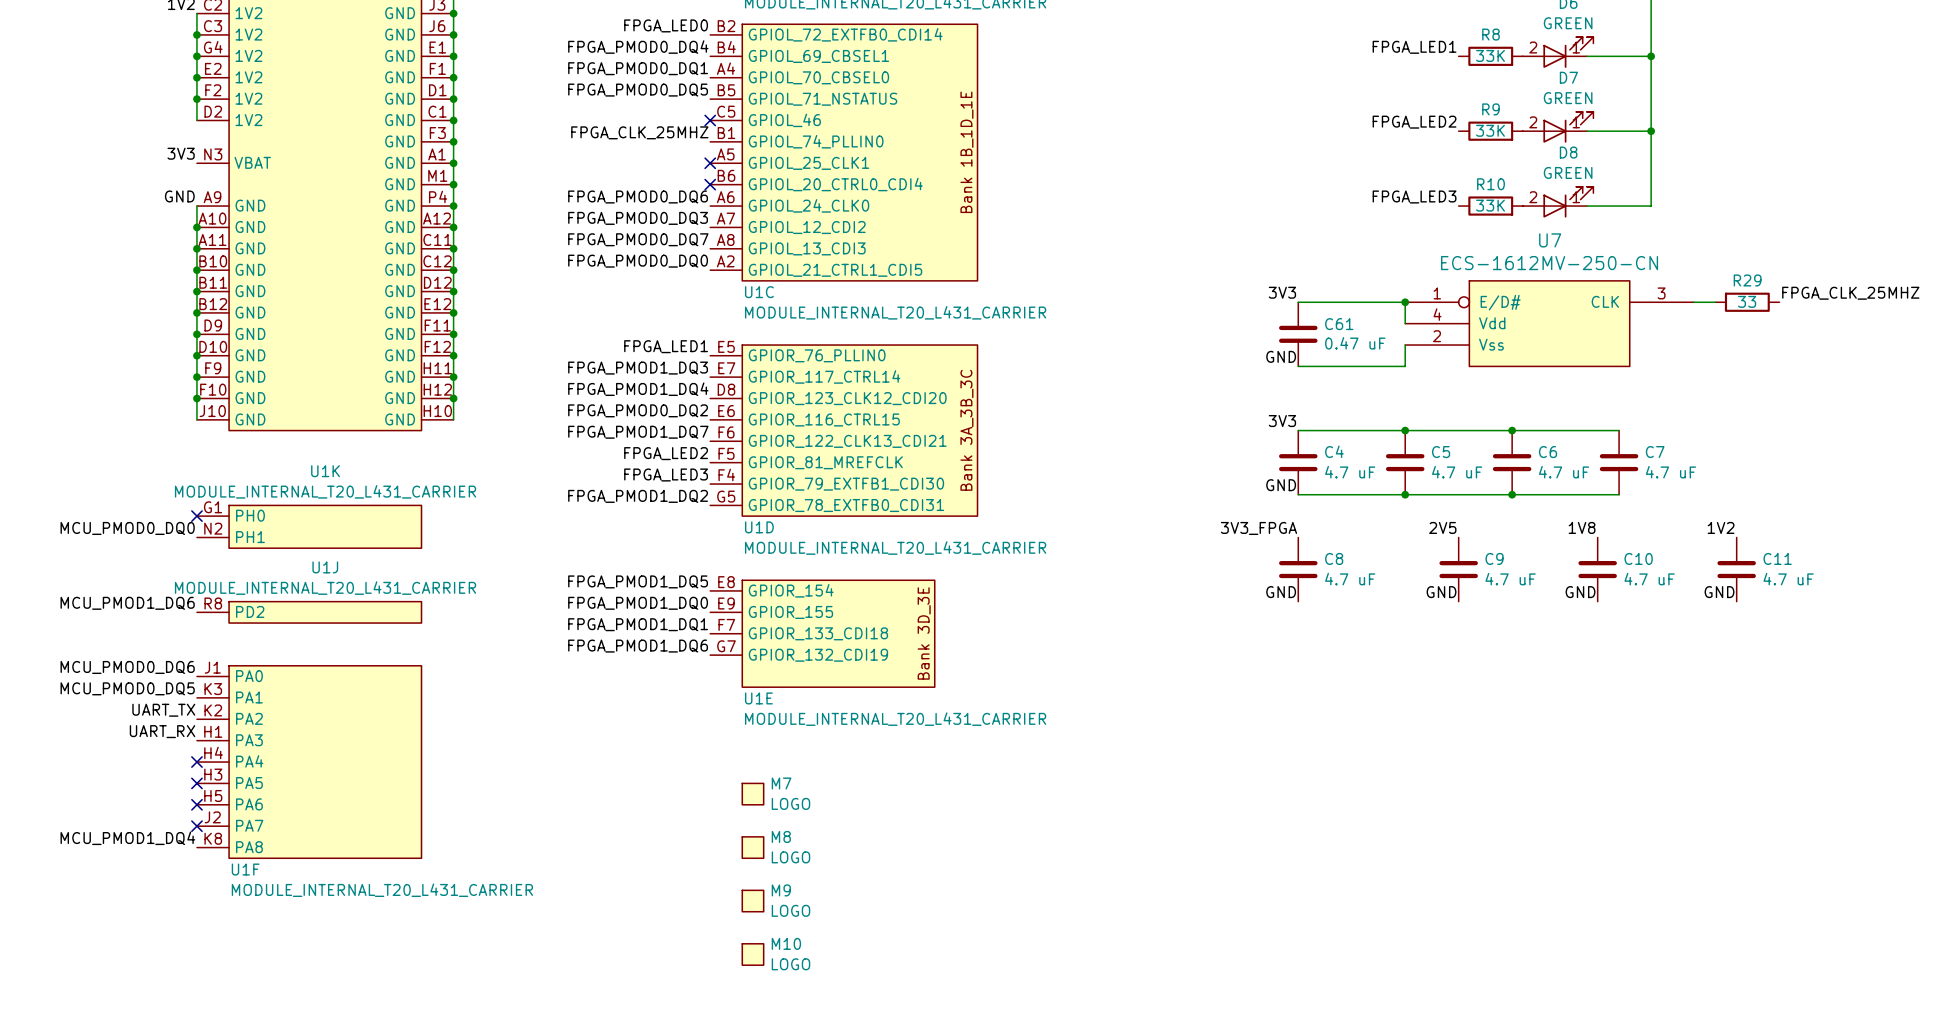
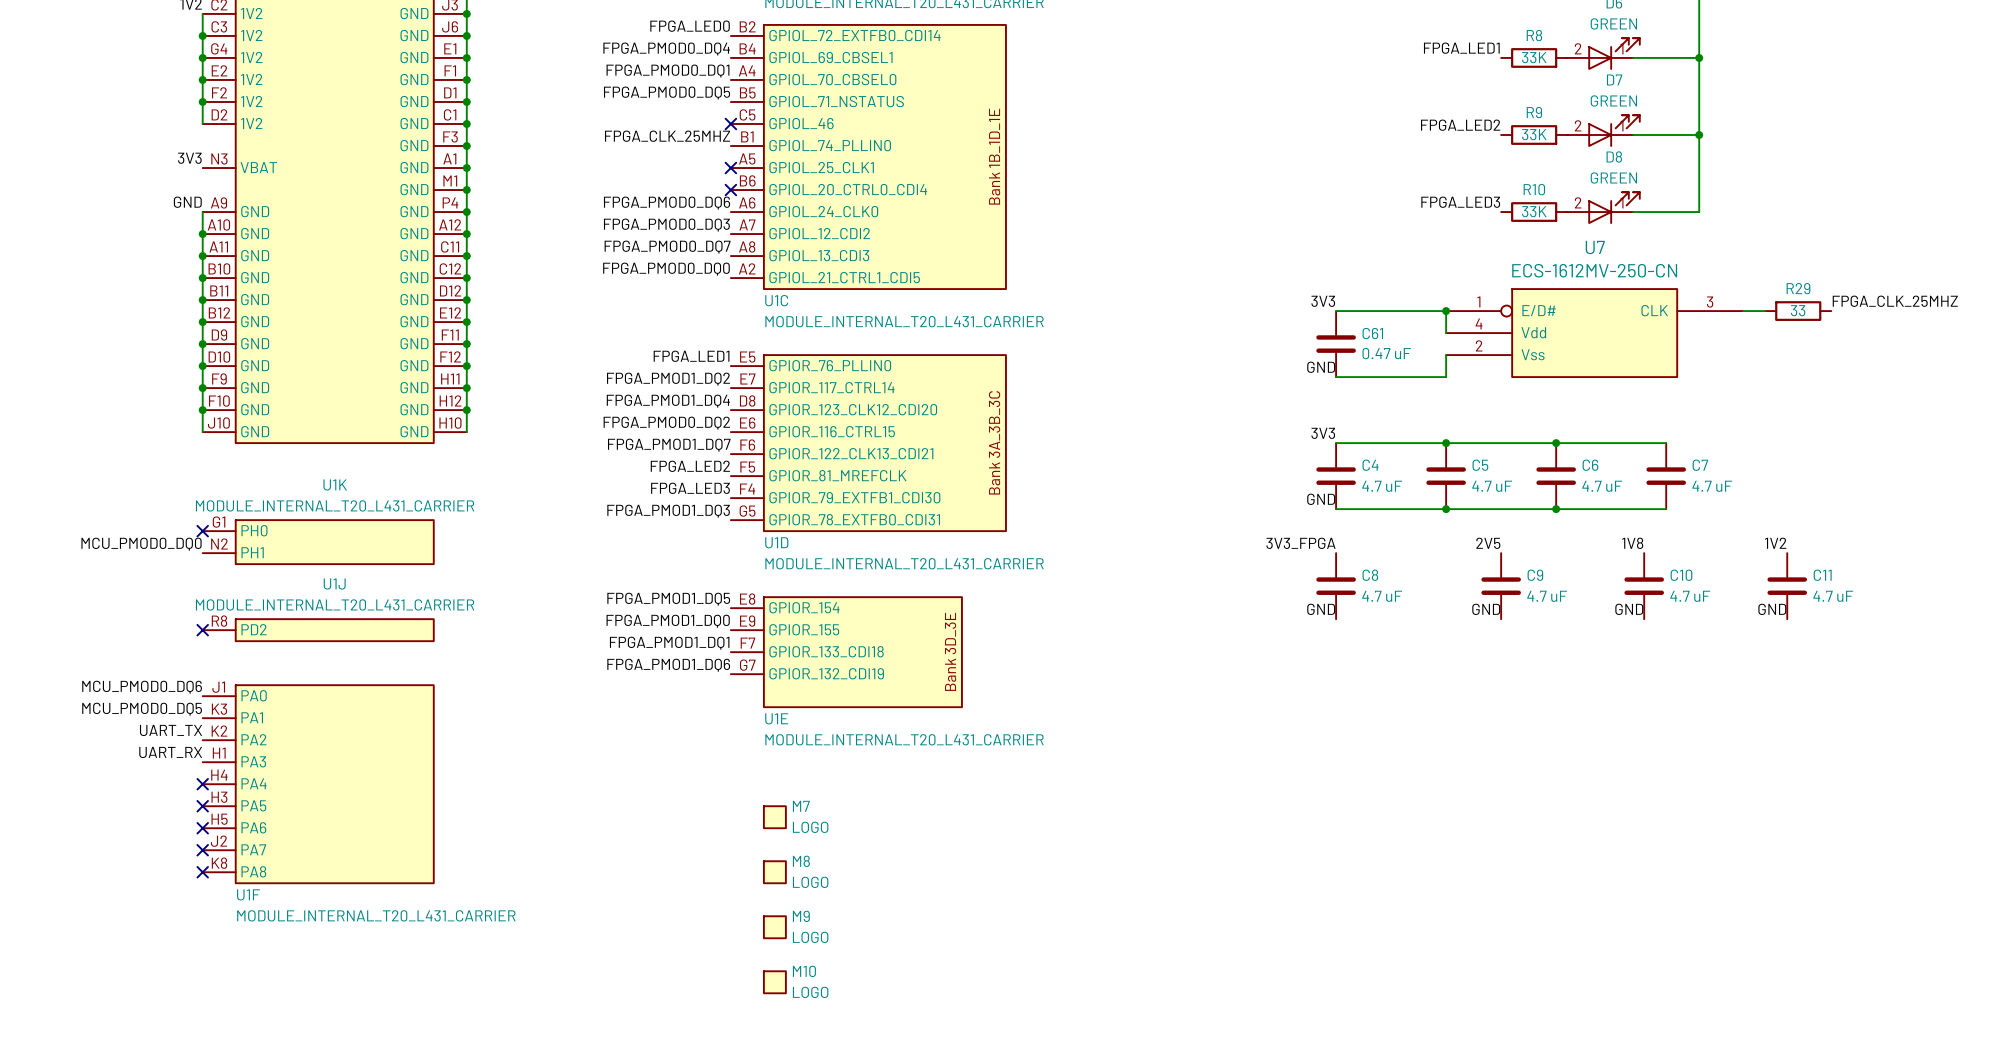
label: FPGA_PMOD1_DQ3 (638, 368) -> FPGA_PMOD1_DQ2 (668, 379)
label: FPGA_PMOD1_DQ2 (638, 496) -> FPGA_PMOD1_DQ3 (668, 511)
label: MCU_PMOD1_DQ6 (127, 603) -> none
no-connect mark: none -> (202, 630)
label: MCU_PMOD1_DQ4 (127, 838) -> none
no-connect mark: none -> (202, 872)

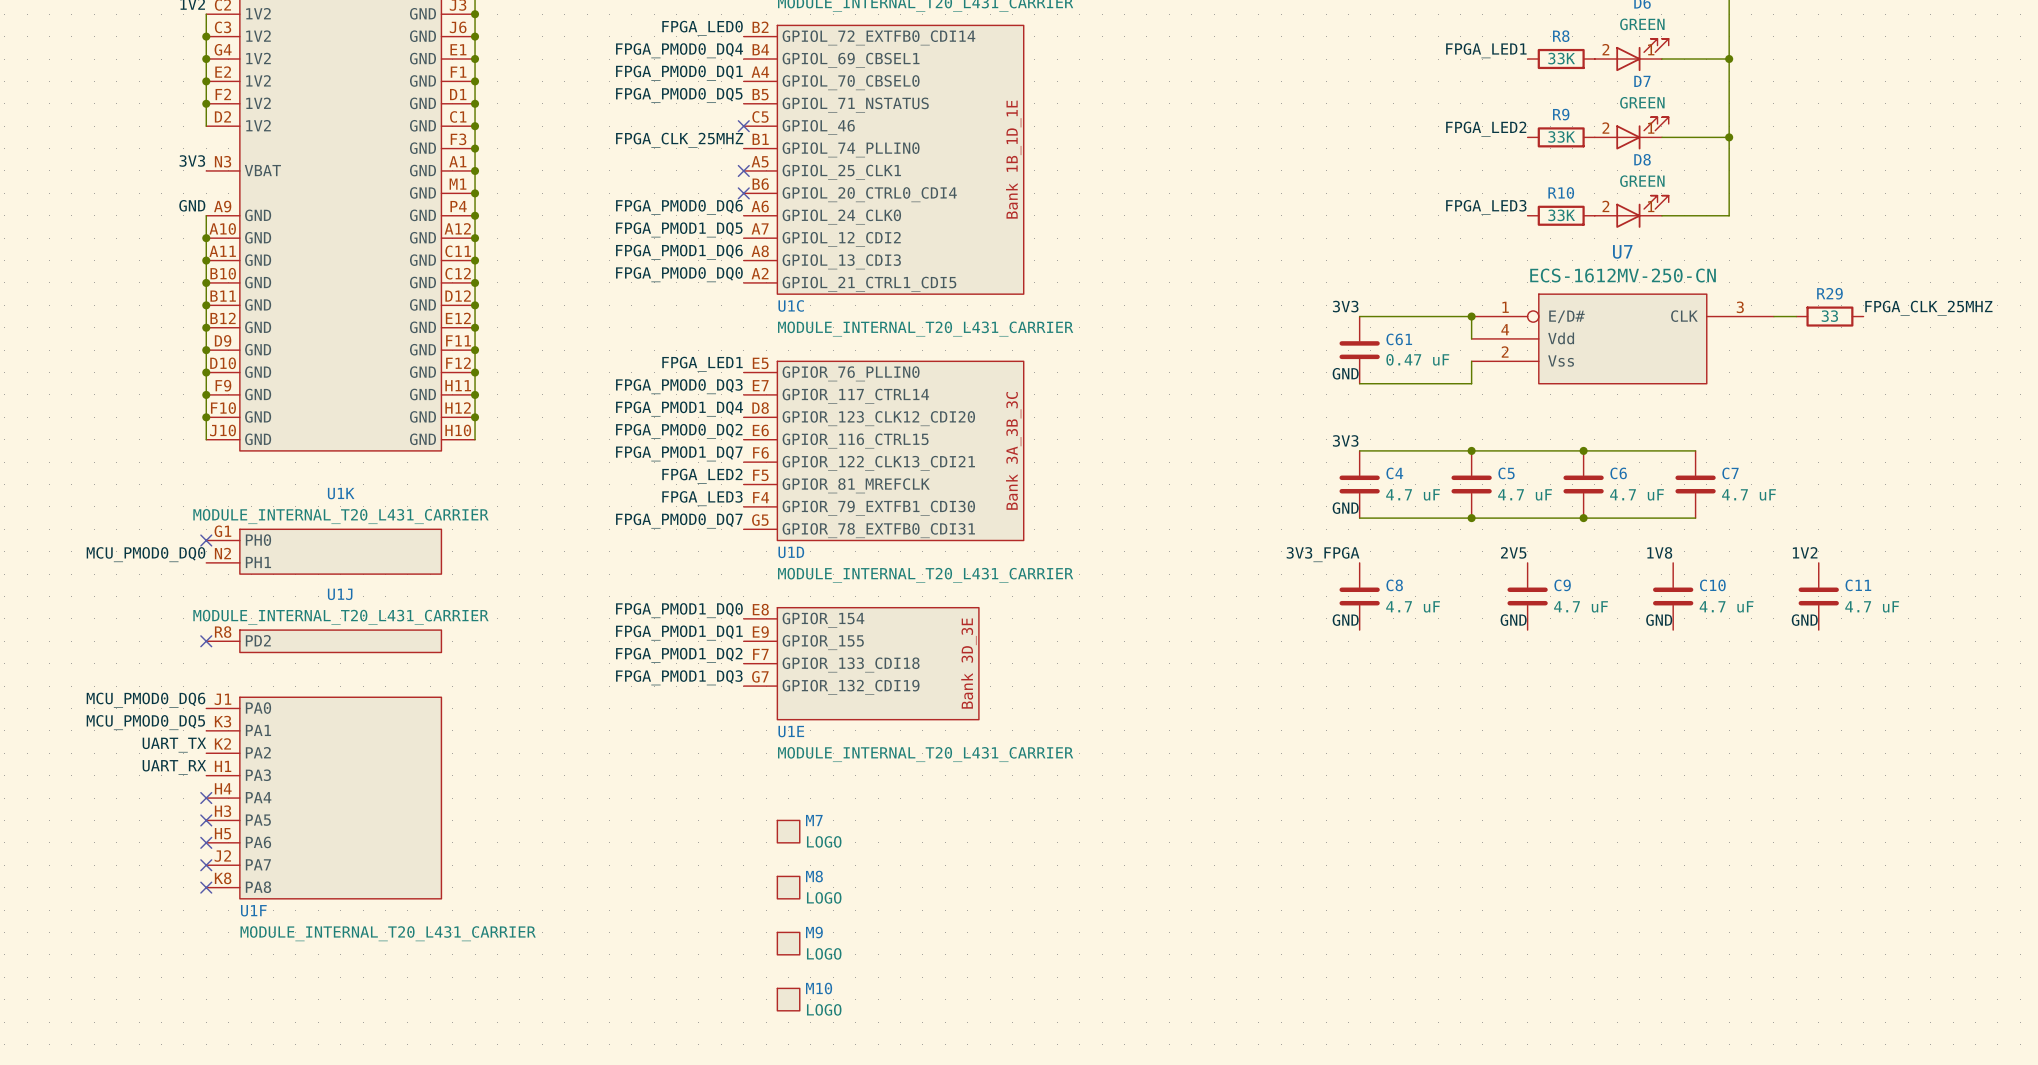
label: FPGA_PMOD0_DQ3 (666, 225) -> FPGA_PMOD1_DQ5 (679, 229)
label: FPGA_PMOD0_DQ7 (667, 247) -> FPGA_PMOD1_DQ6 (679, 252)
label: FPGA_PMOD1_DQ2 (668, 379) -> FPGA_PMOD0_DQ3 (679, 386)
label: FPGA_PMOD1_DQ3 (668, 511) -> FPGA_PMOD0_DQ7 (679, 521)
label: FPGA_PMOD1_DQ5 (668, 599) -> FPGA_PMOD1_DQ0 (679, 610)
label: FPGA_PMOD1_DQ0 (668, 621) -> FPGA_PMOD1_DQ1 (679, 632)
label: FPGA_PMOD1_DQ1 (669, 643) -> FPGA_PMOD1_DQ2 (679, 655)
label: FPGA_PMOD1_DQ6 (668, 665) -> FPGA_PMOD1_DQ3 (679, 677)

